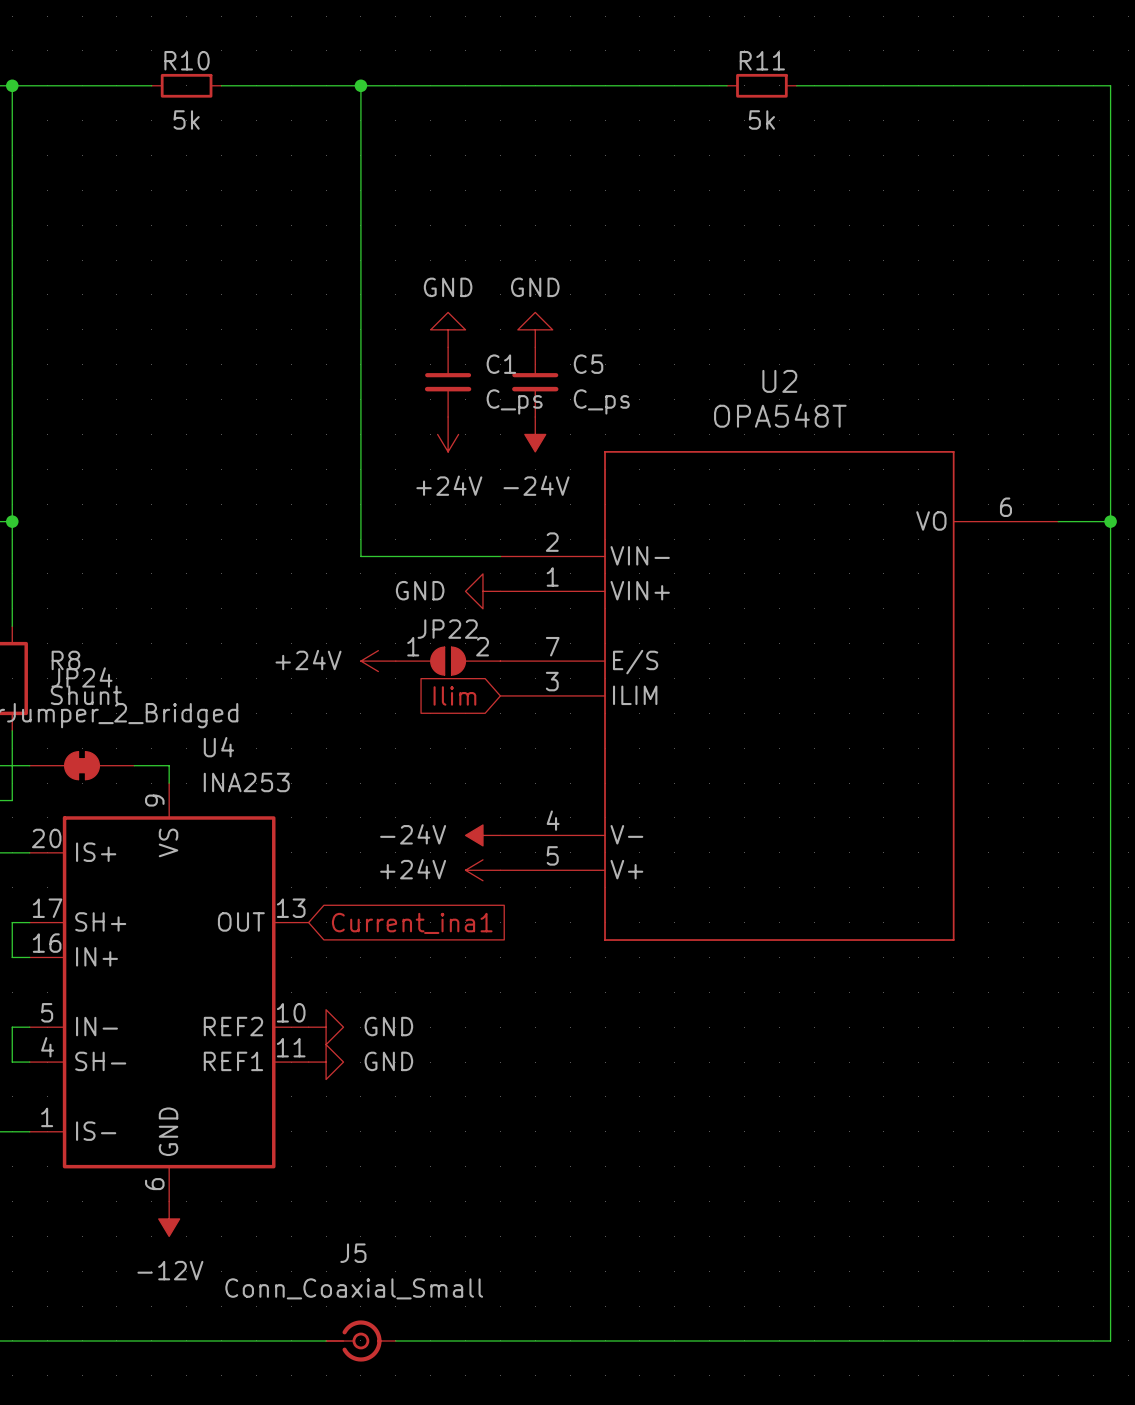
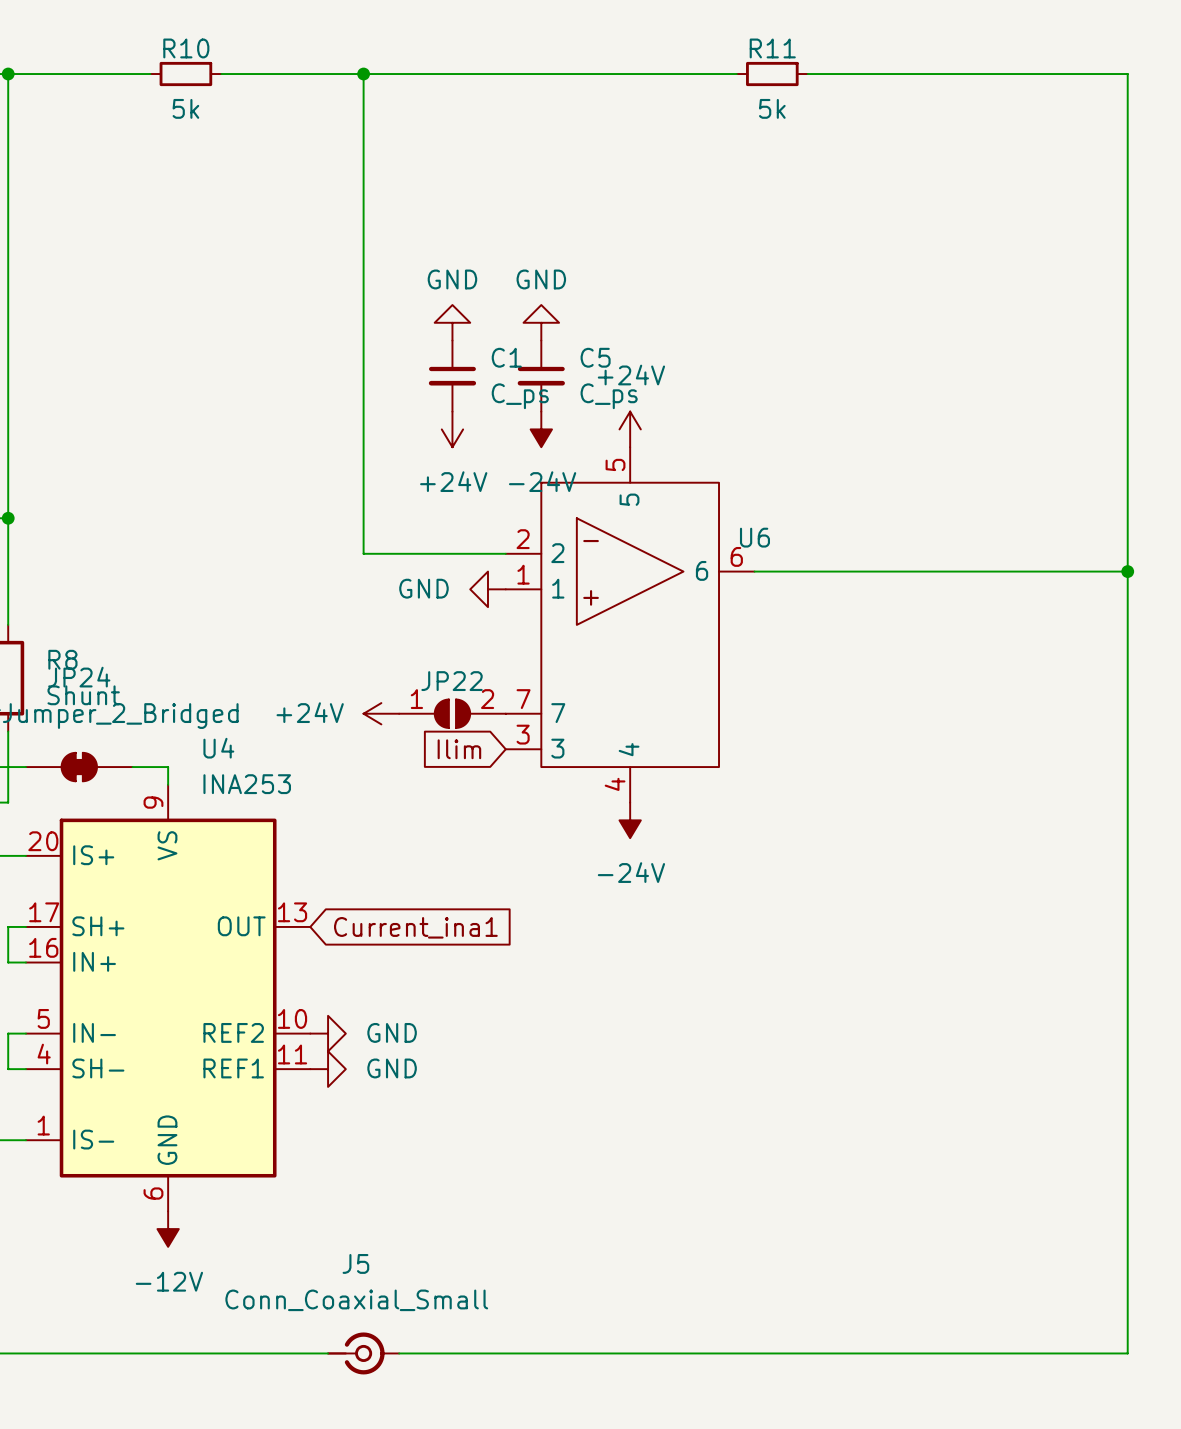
power symbol: none -> +24V (630, 429)
wire: (1058, 521) (1110, 521) -> none
junction position: (1110, 521) -> (1127, 571)
wire: none -> (754, 571) (1127, 571)
U6: none -> (630, 624)
power symbol position: +24V (378, 661) -> +24V (381, 713)
JP22 position: (448, 661) -> (452, 713)
global label position: Ilim (454, 695) -> Ilim (459, 749)
U2: OPA548T (779, 695) -> none
power symbol rotation: 0° (482, 835) -> 90° counterclockwise (630, 820)
power symbol position: -24V (482, 835) -> -24V (630, 820)
power symbol: +24V (482, 870) -> none

